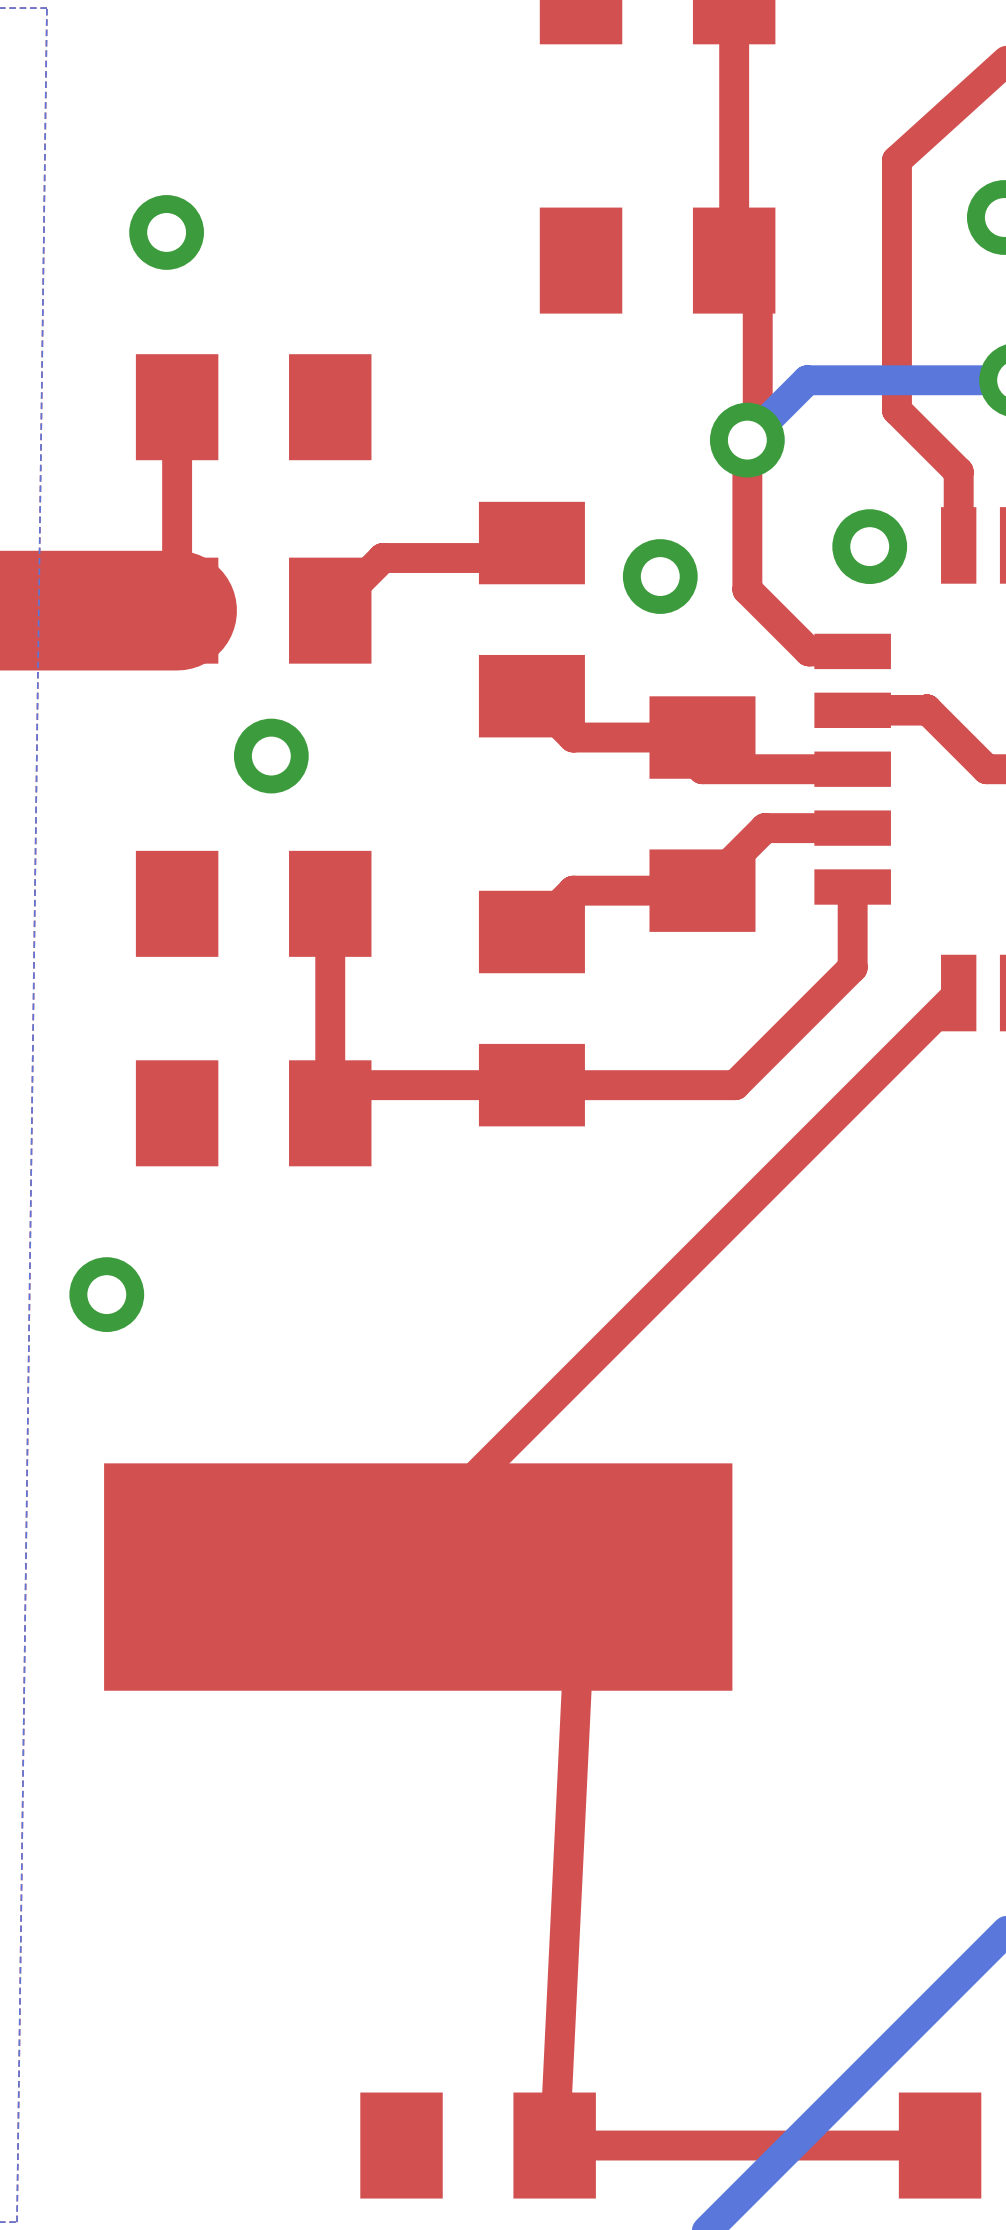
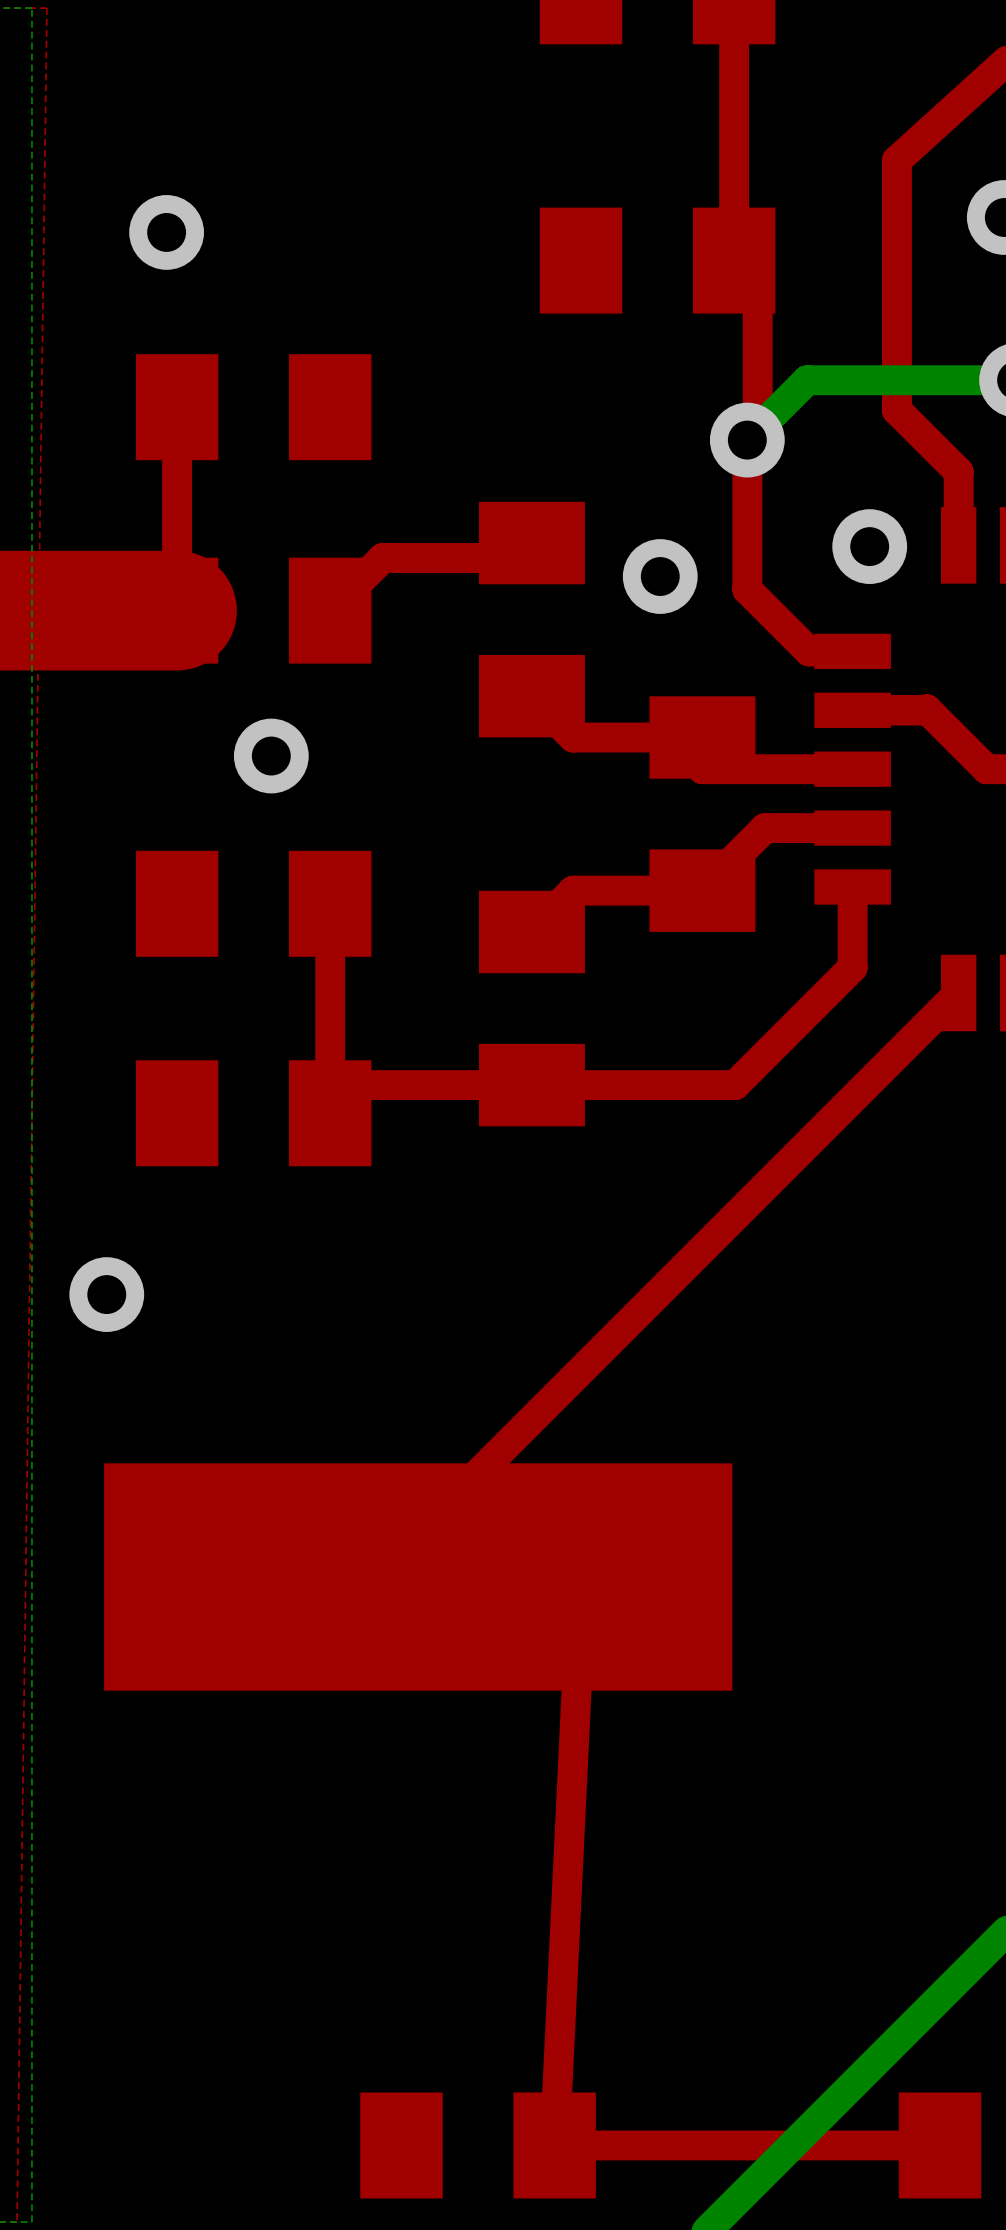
bottom zone outline: (31, 8) (46, 8) (17, 2222) -> (31, 8) (31, 2222) (17, 2222)

